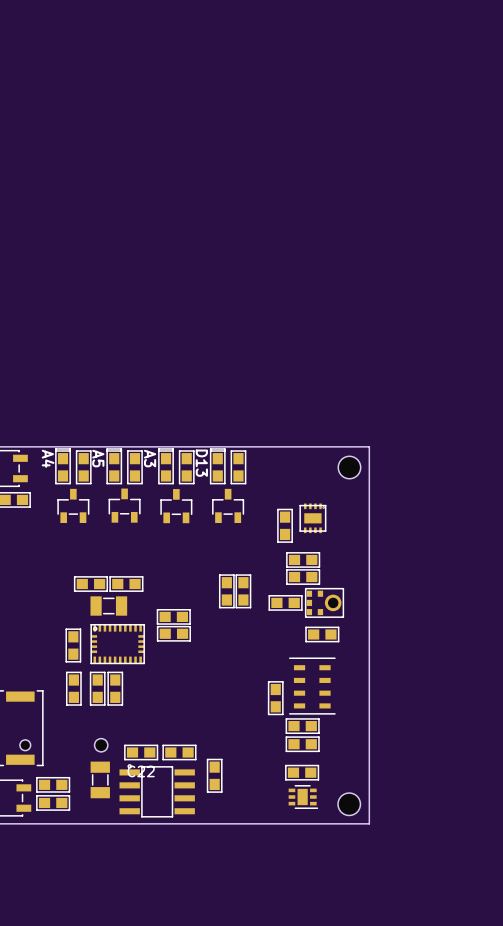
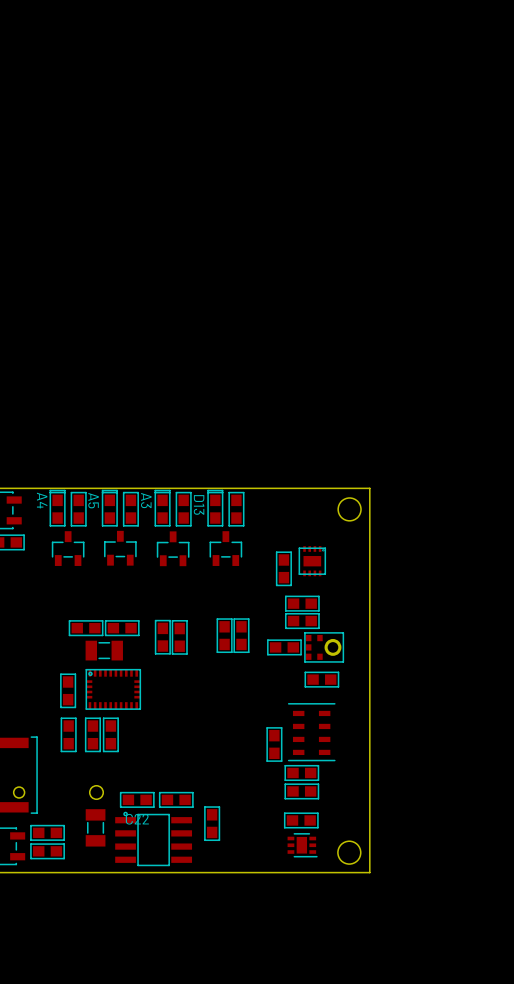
part: none -> (162, 637)
part: none -> (179, 637)
part: (173, 616) -> none
part: (173, 633) -> none

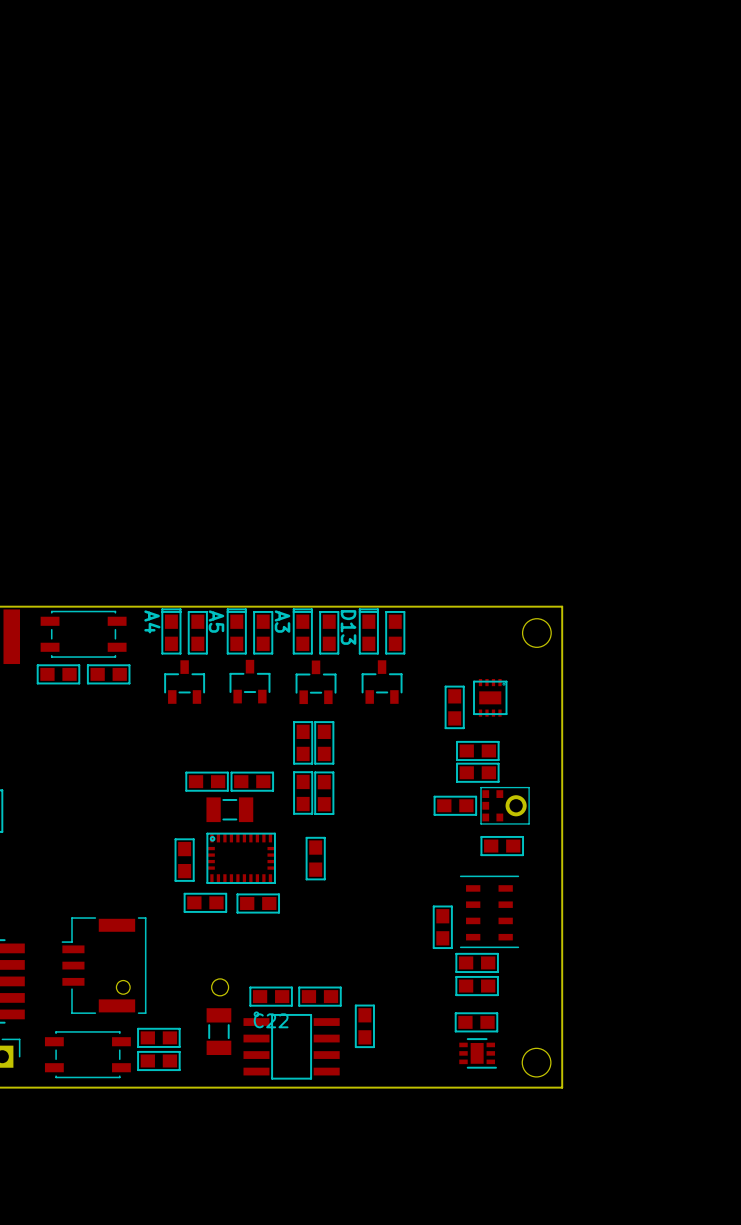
part: none -> (303, 742)
part: none -> (324, 742)
part: (224, 635) -> none
part: (241, 635) -> none
part: none -> (315, 858)
part: none -> (205, 902)
part: none -> (258, 903)
part: (68, 734) -> none
part: (92, 734) -> none
part: (110, 734) -> none

